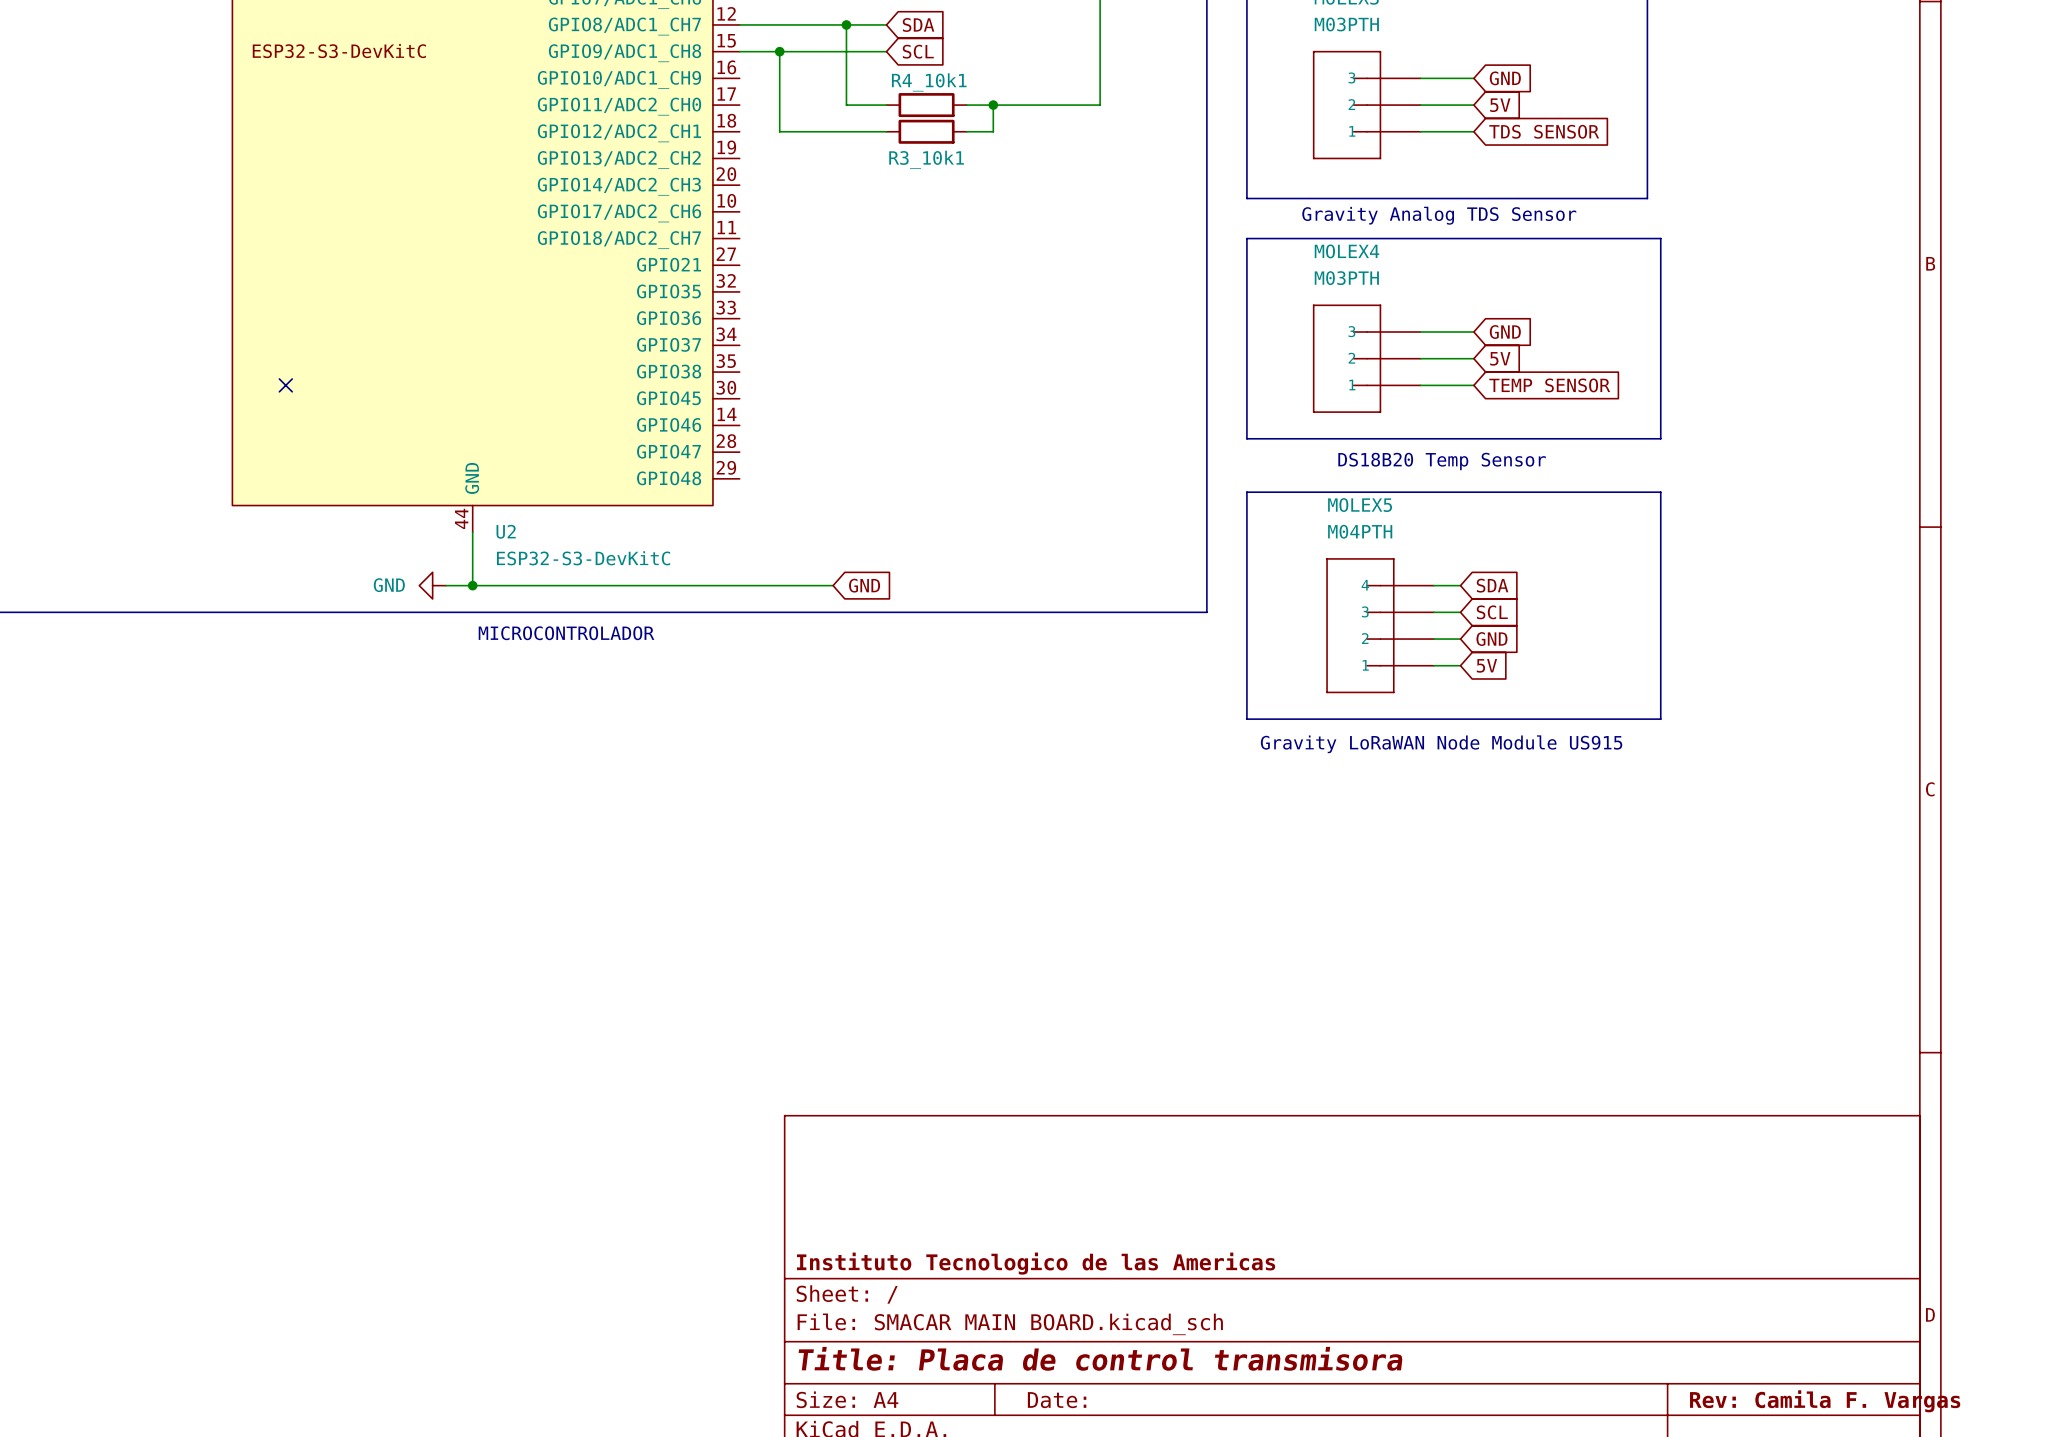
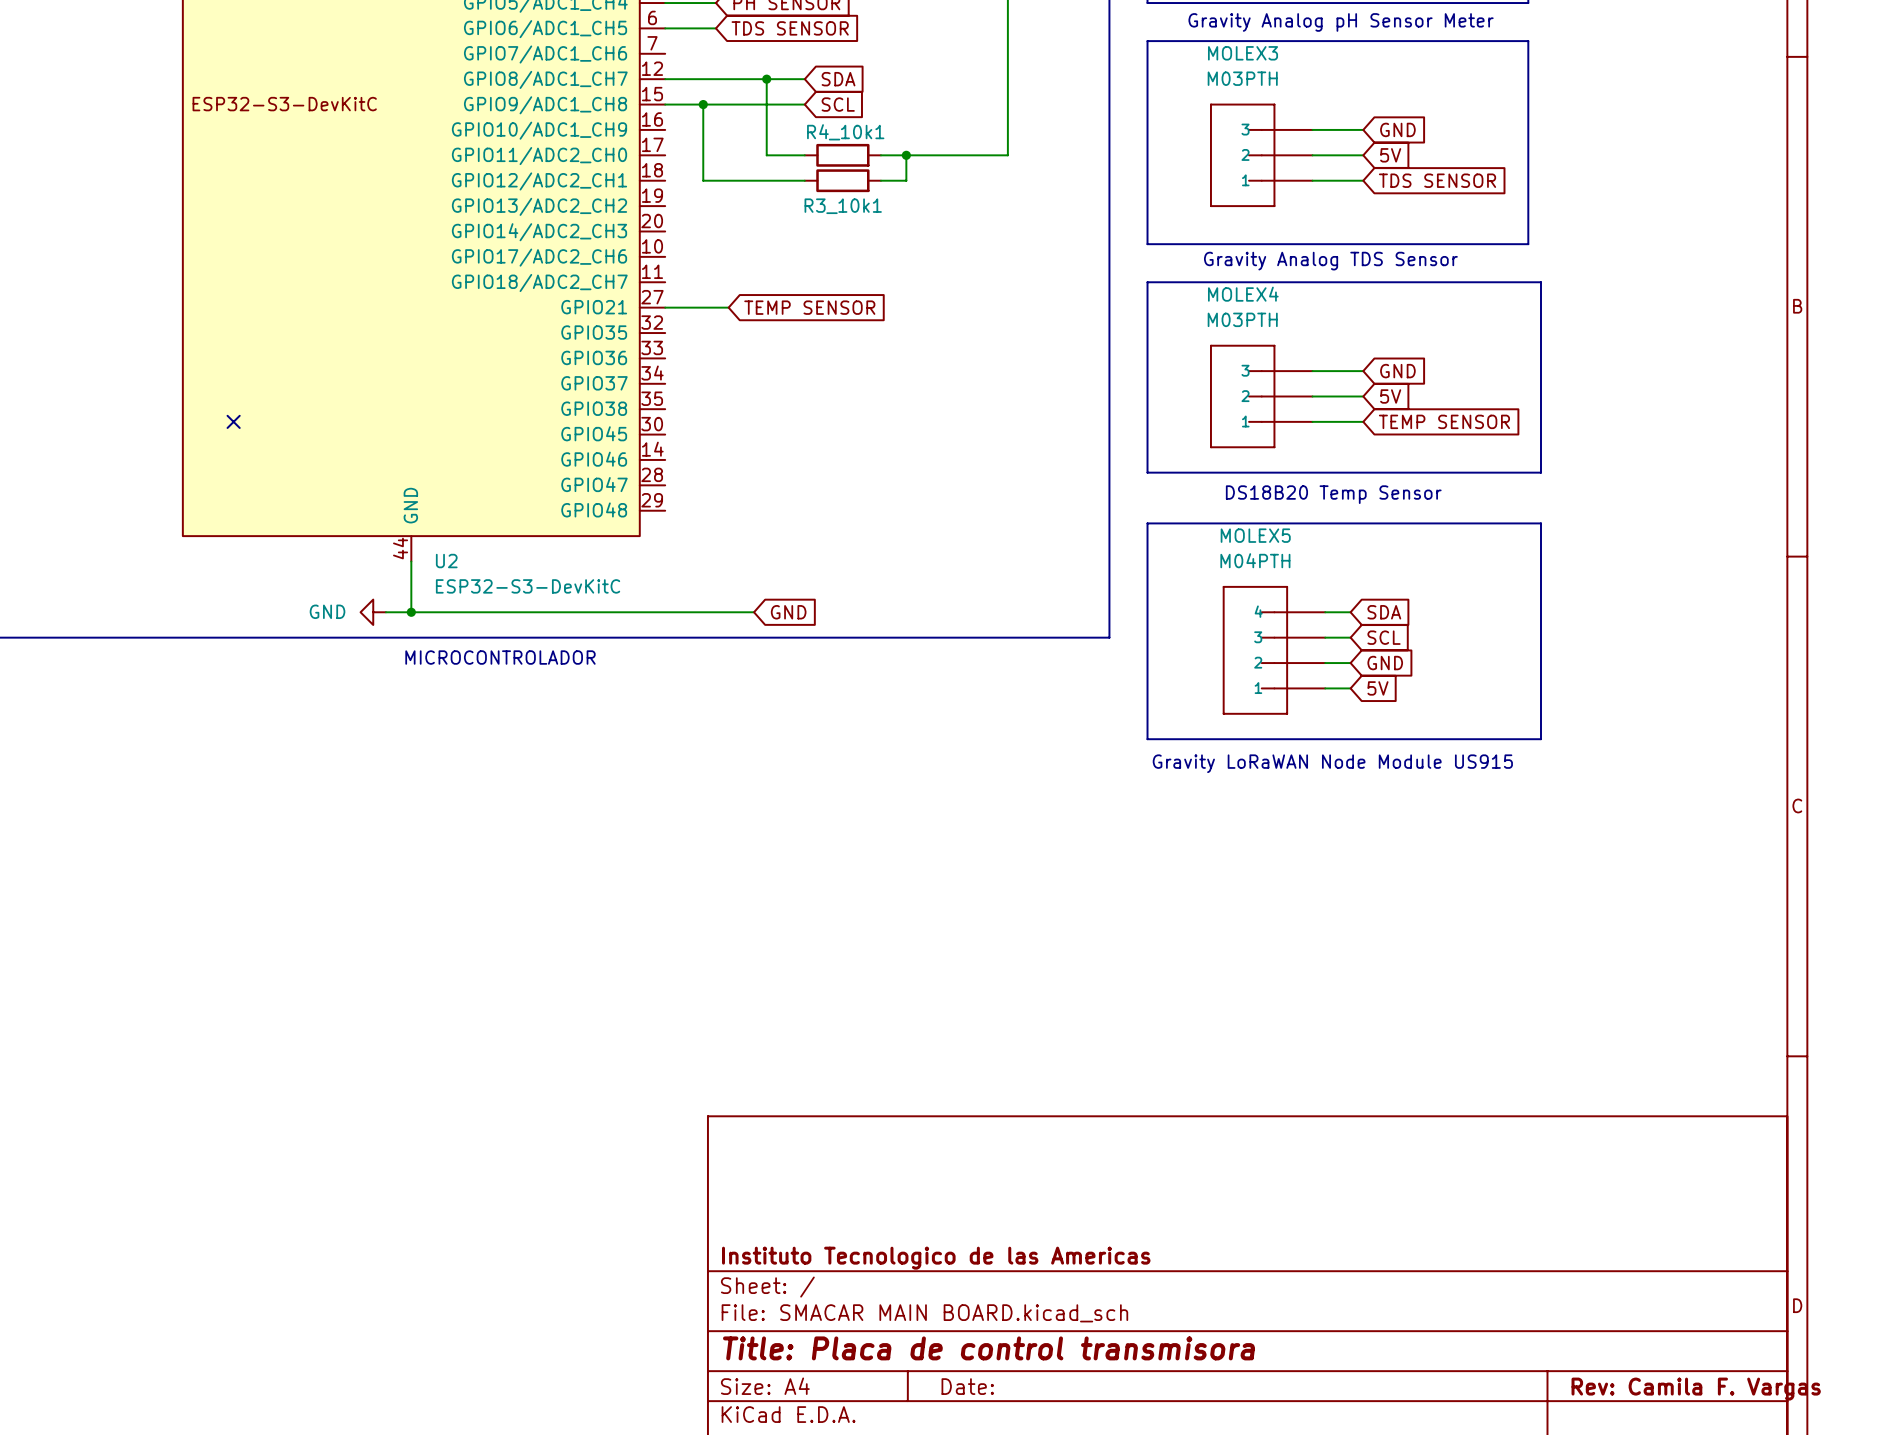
wire: none -> (665, 307) (728, 307)
global label: none -> TEMP SENSOR (809, 307)

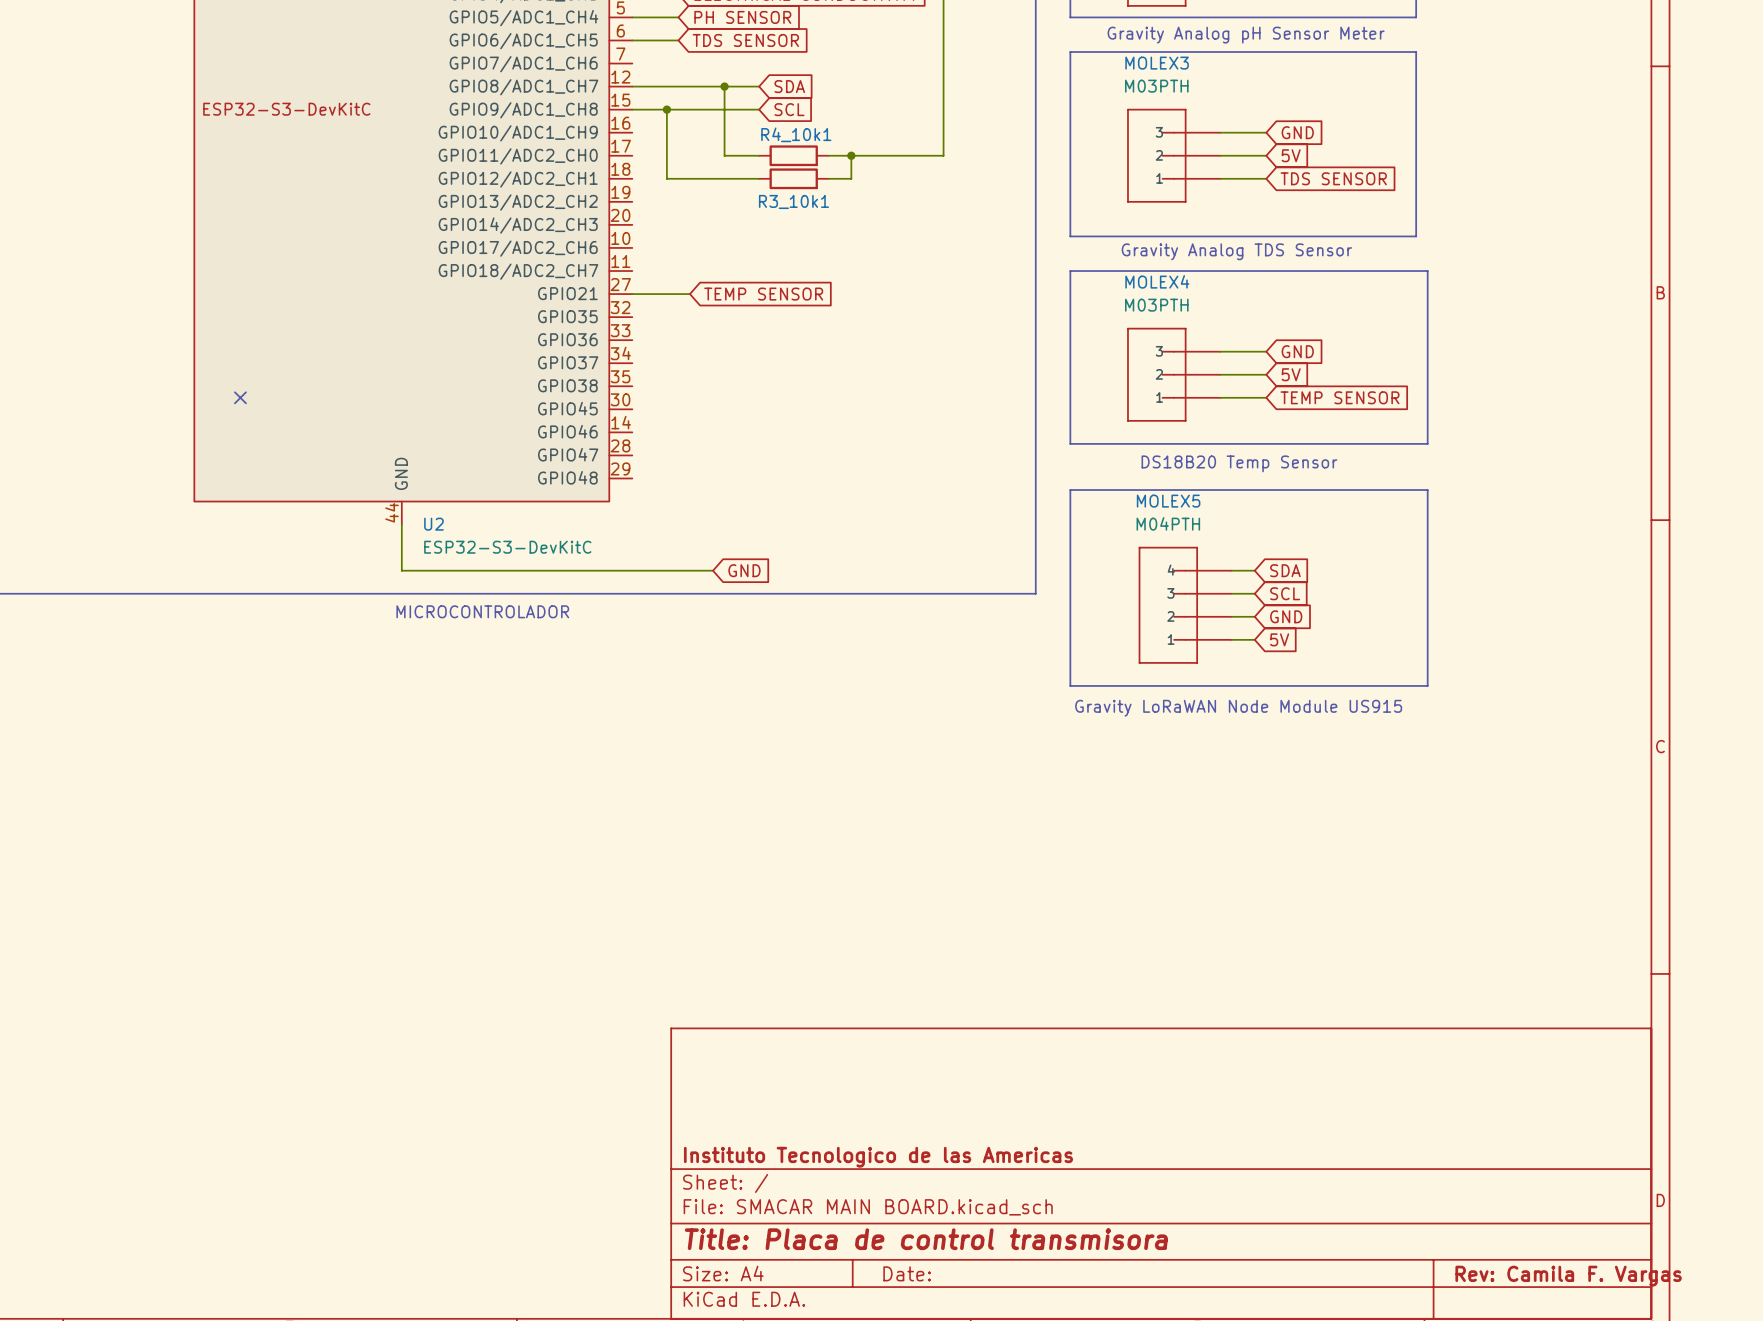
power symbol: GND (373, 612) -> none
wire: (385, 612) (411, 612) -> none
junction: (411, 612) -> none

